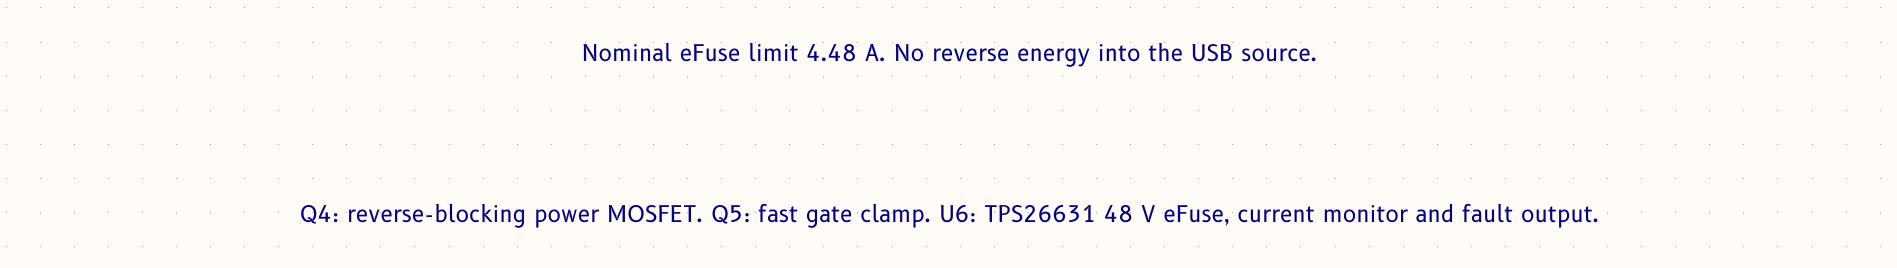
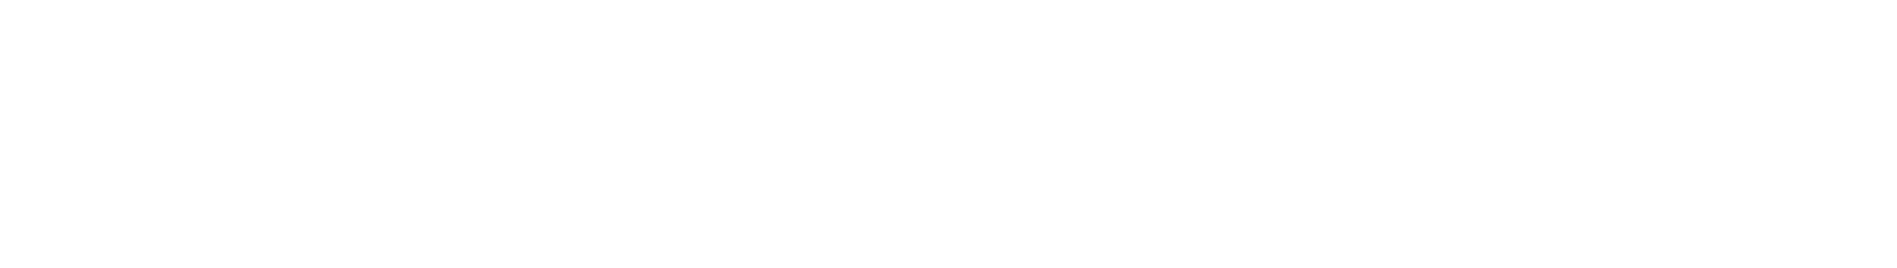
text: Nominal eFuse limit 4.48 A. No reverse energy into the USB source. (949, 54) -> none
text: Q4: reverse-blocking power MOSFET. Q5: fast gate clamp. U6: TPS26631 48 V eFuse, current monitor and fault output. (949, 215) -> none

